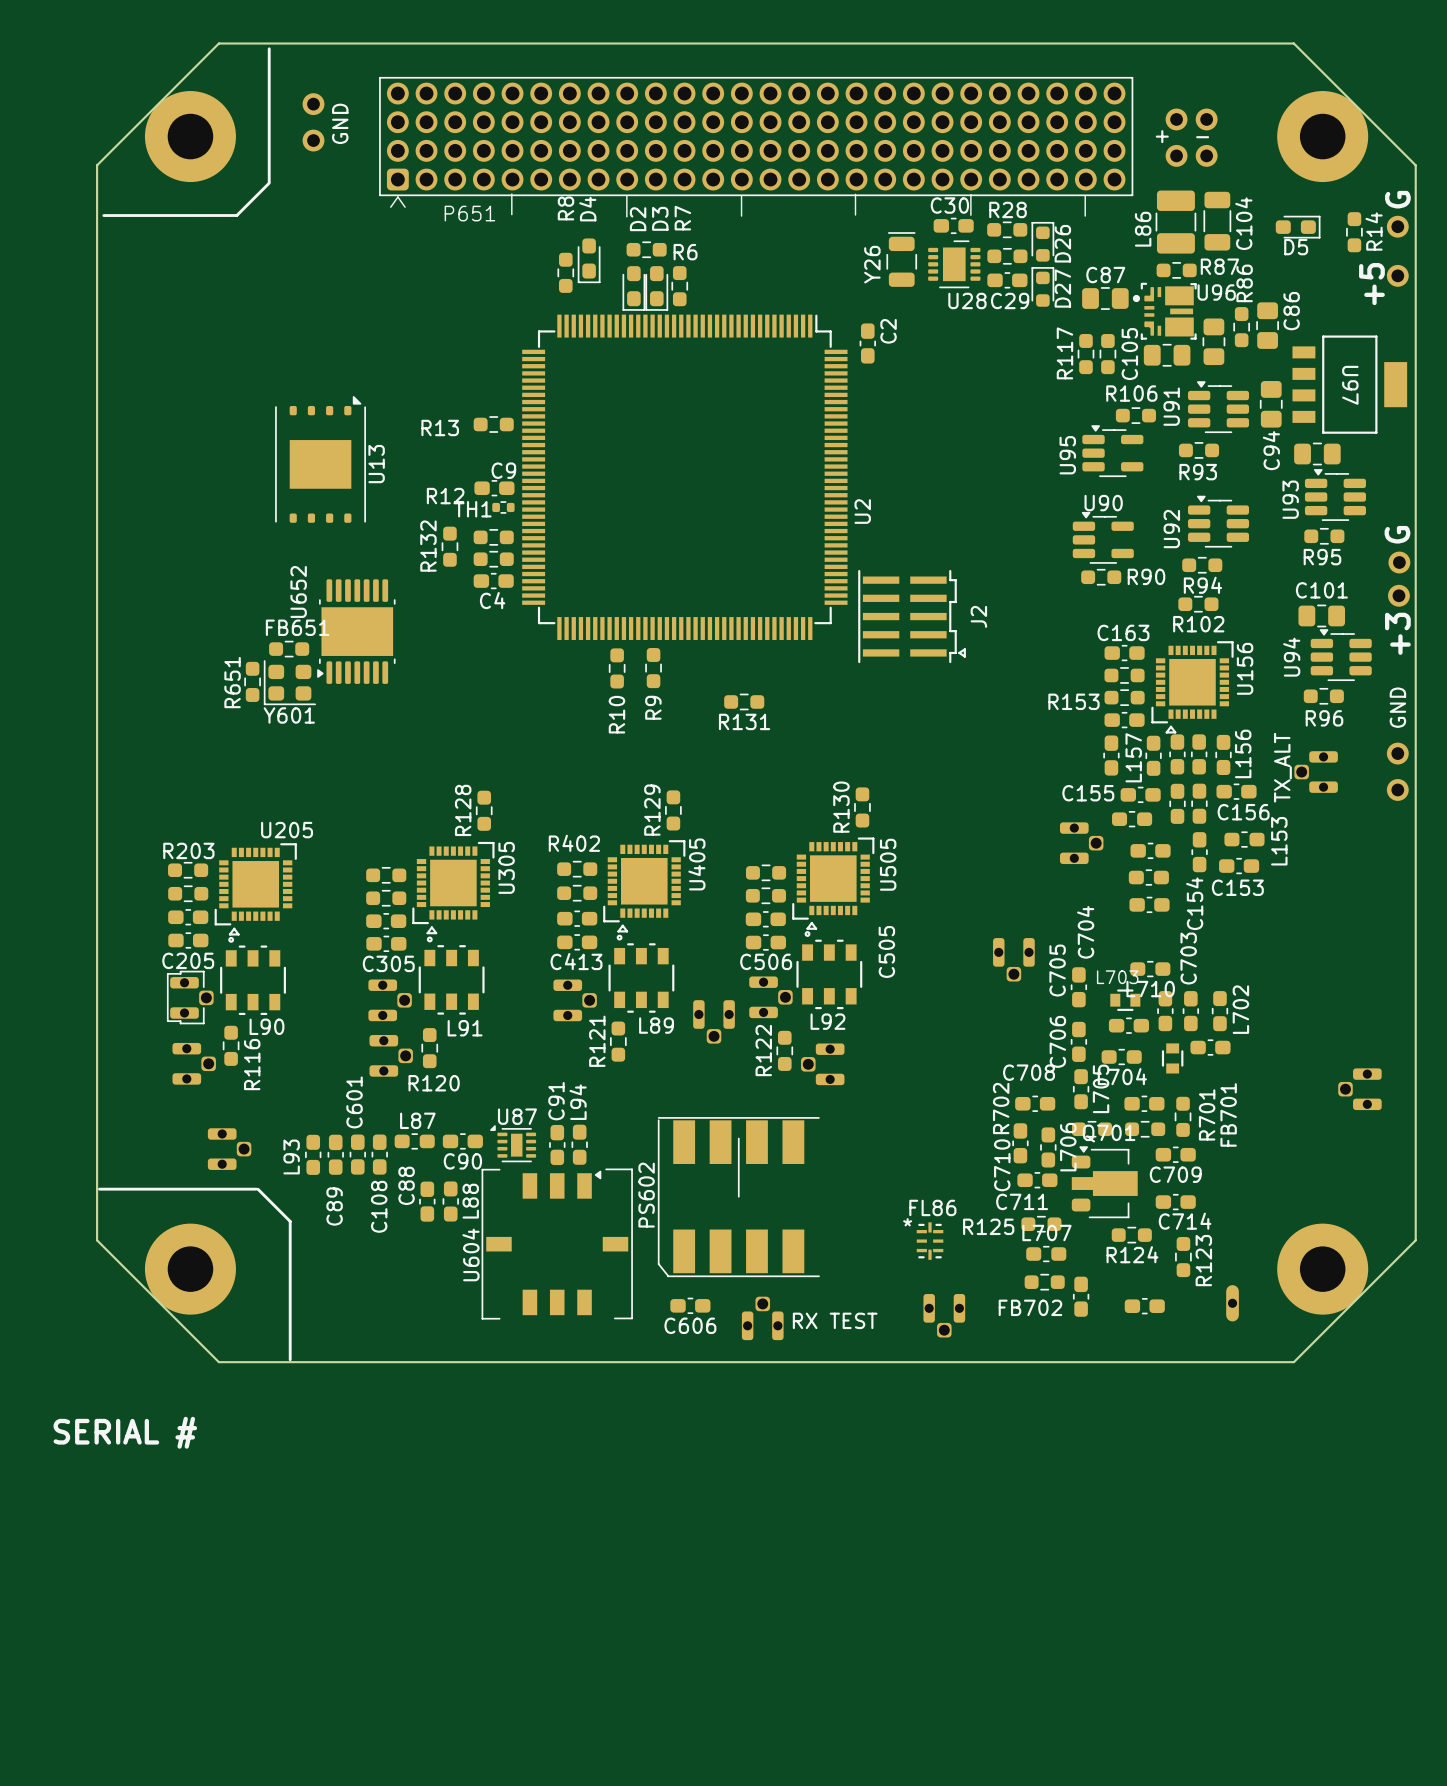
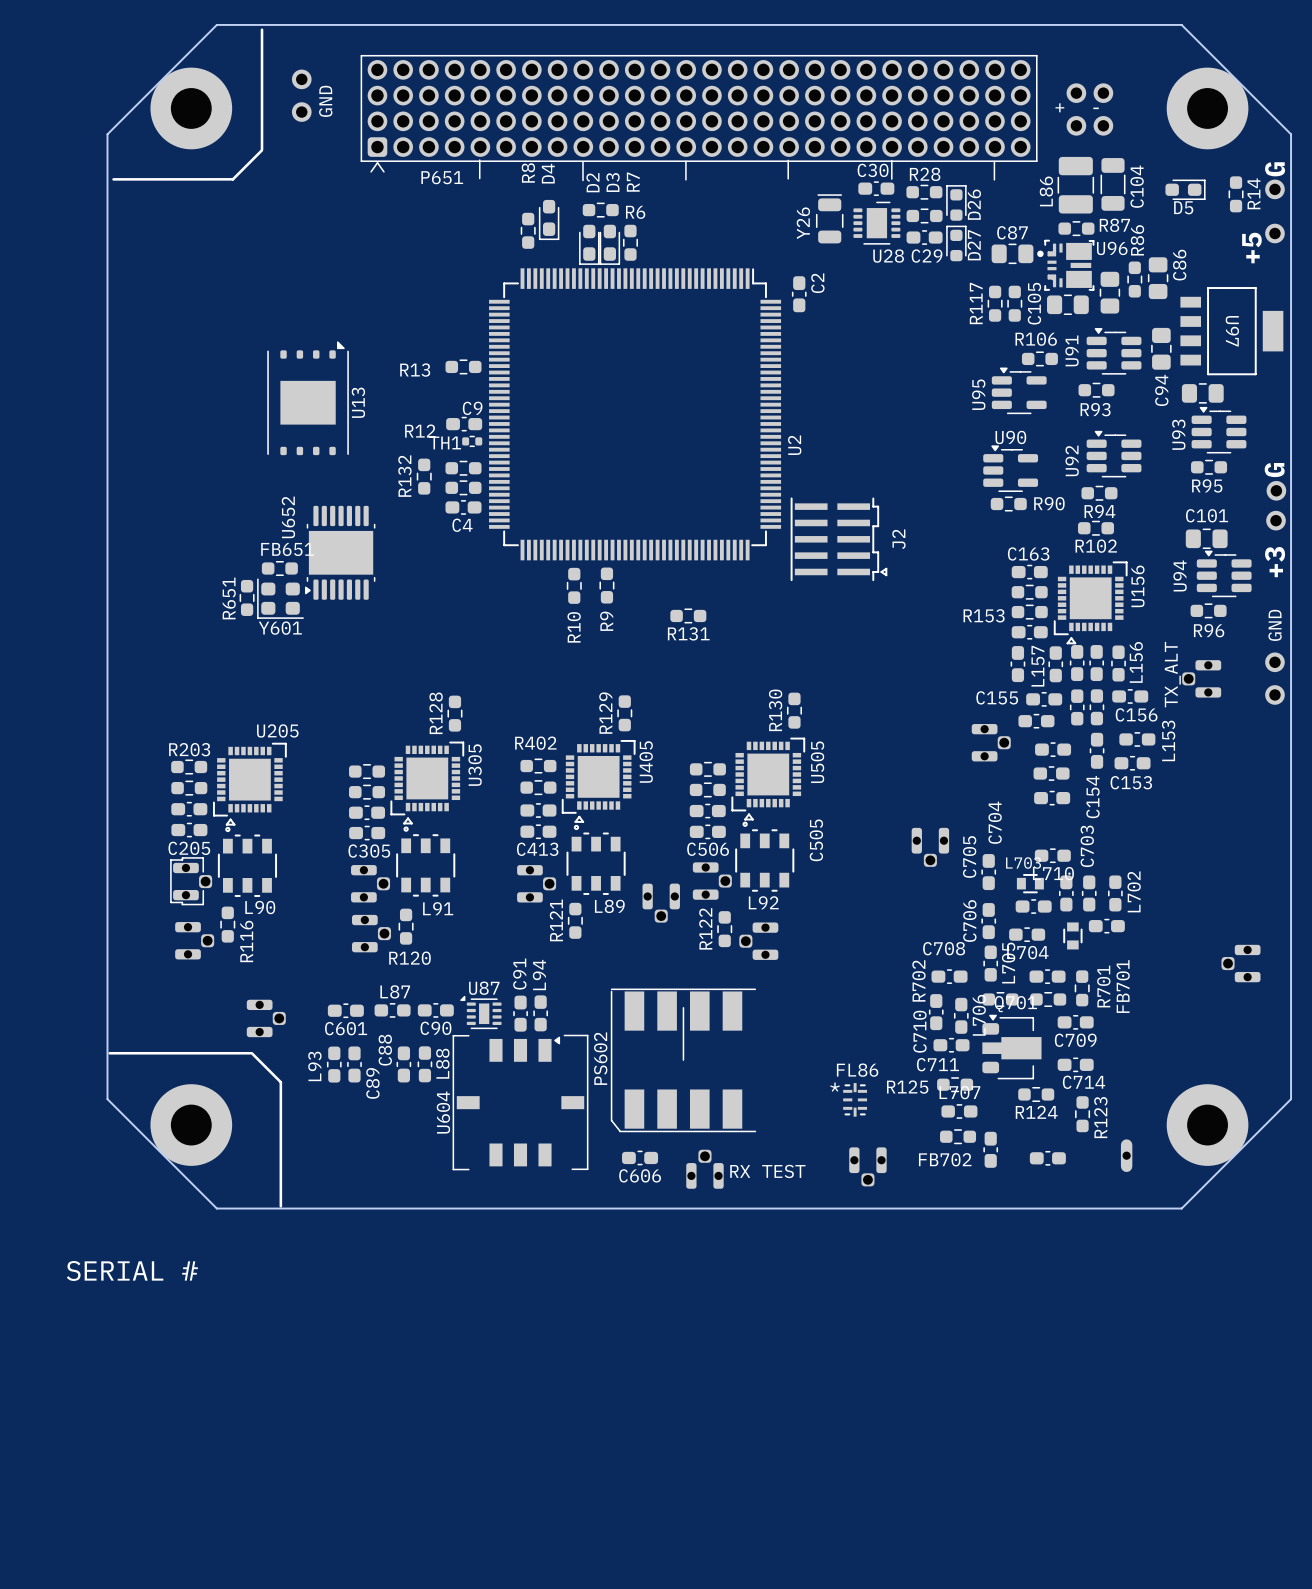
C601 name position: C601 (354, 1102) -> C601 (346, 1028)
part position: (229, 1149) -> (266, 1018)
L93 position: (313, 1154) -> (334, 1064)
C89 position: (335, 1154) -> (354, 1064)
C601 rotation: 0° (357, 1154) -> 90° clockwise (345, 1010)
C108: (379, 1154) -> none
C89 name position: C89 (334, 1206) -> C89 (372, 1083)

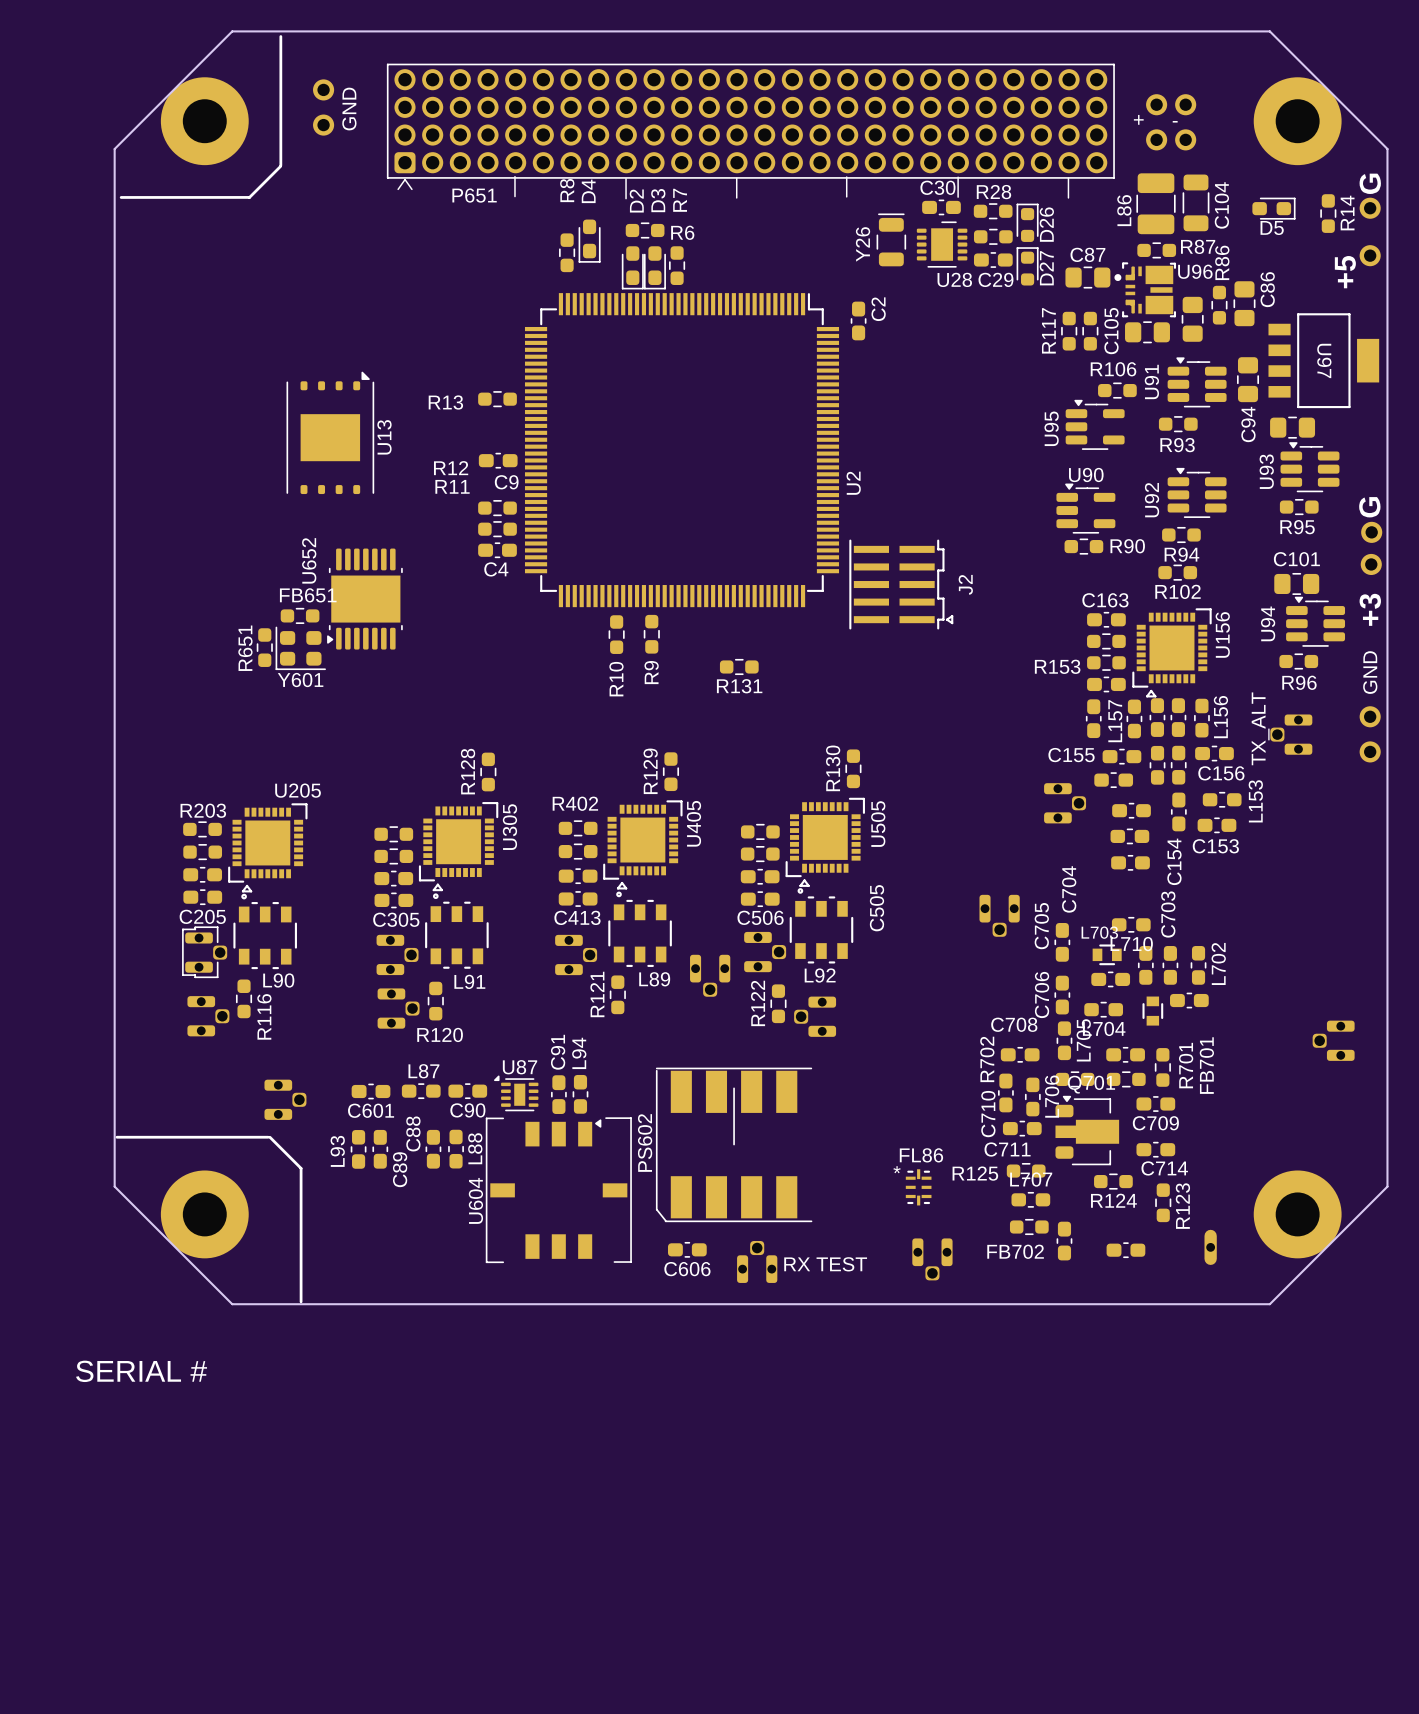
C9 name position: C9 (472, 408) -> C9 (506, 482)
TH1: (472, 441) -> none
R11 name: none -> R11 (452, 486)
R132: (424, 476) -> none

